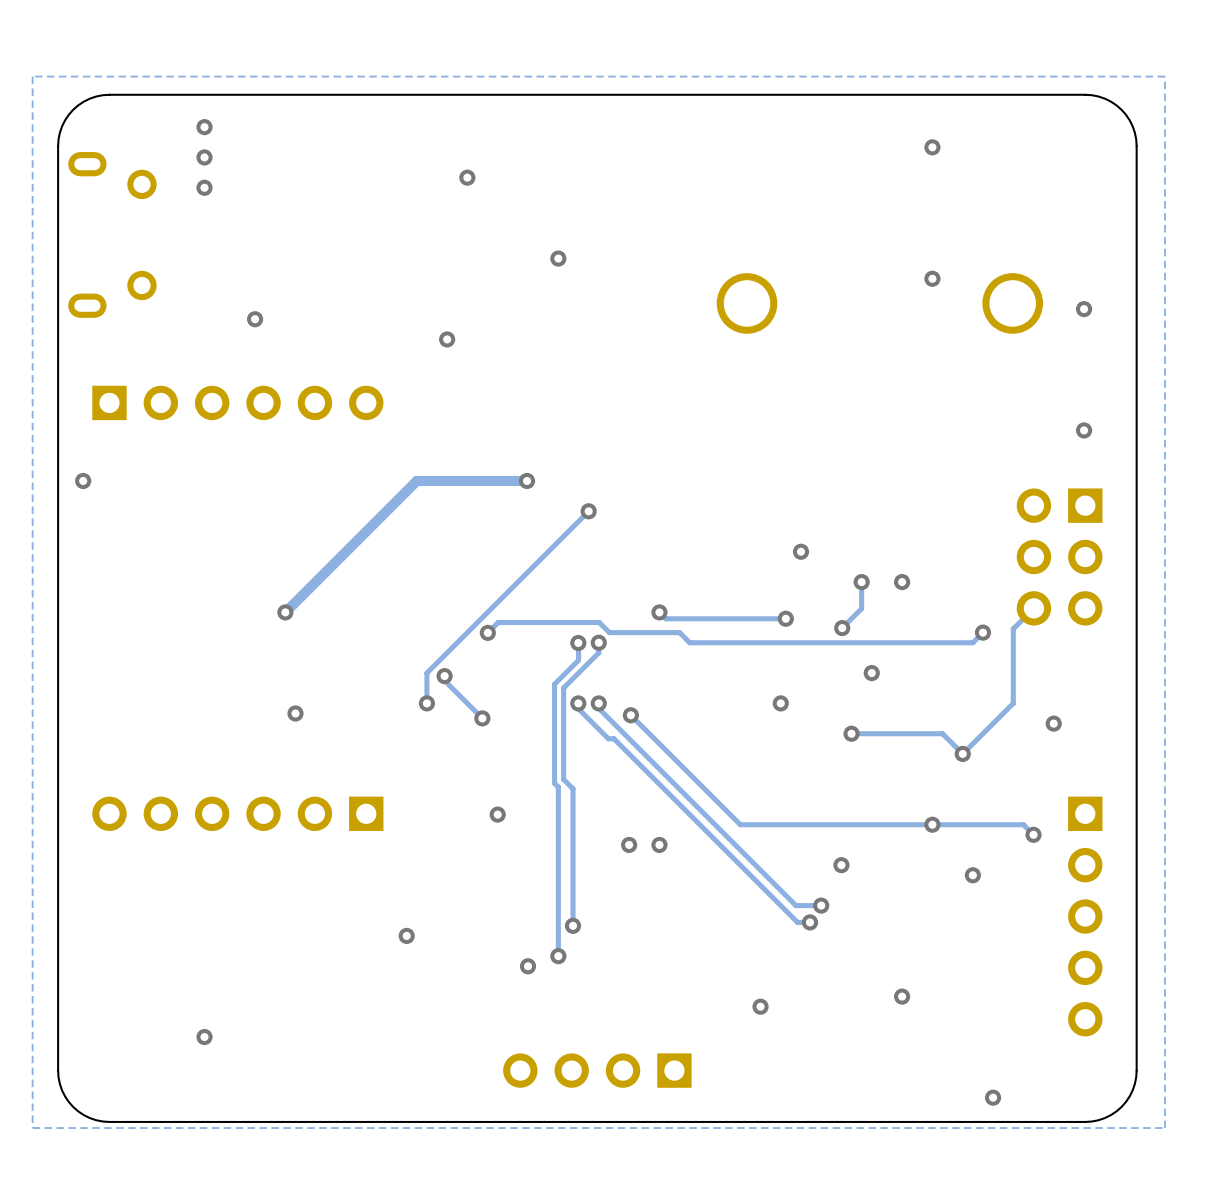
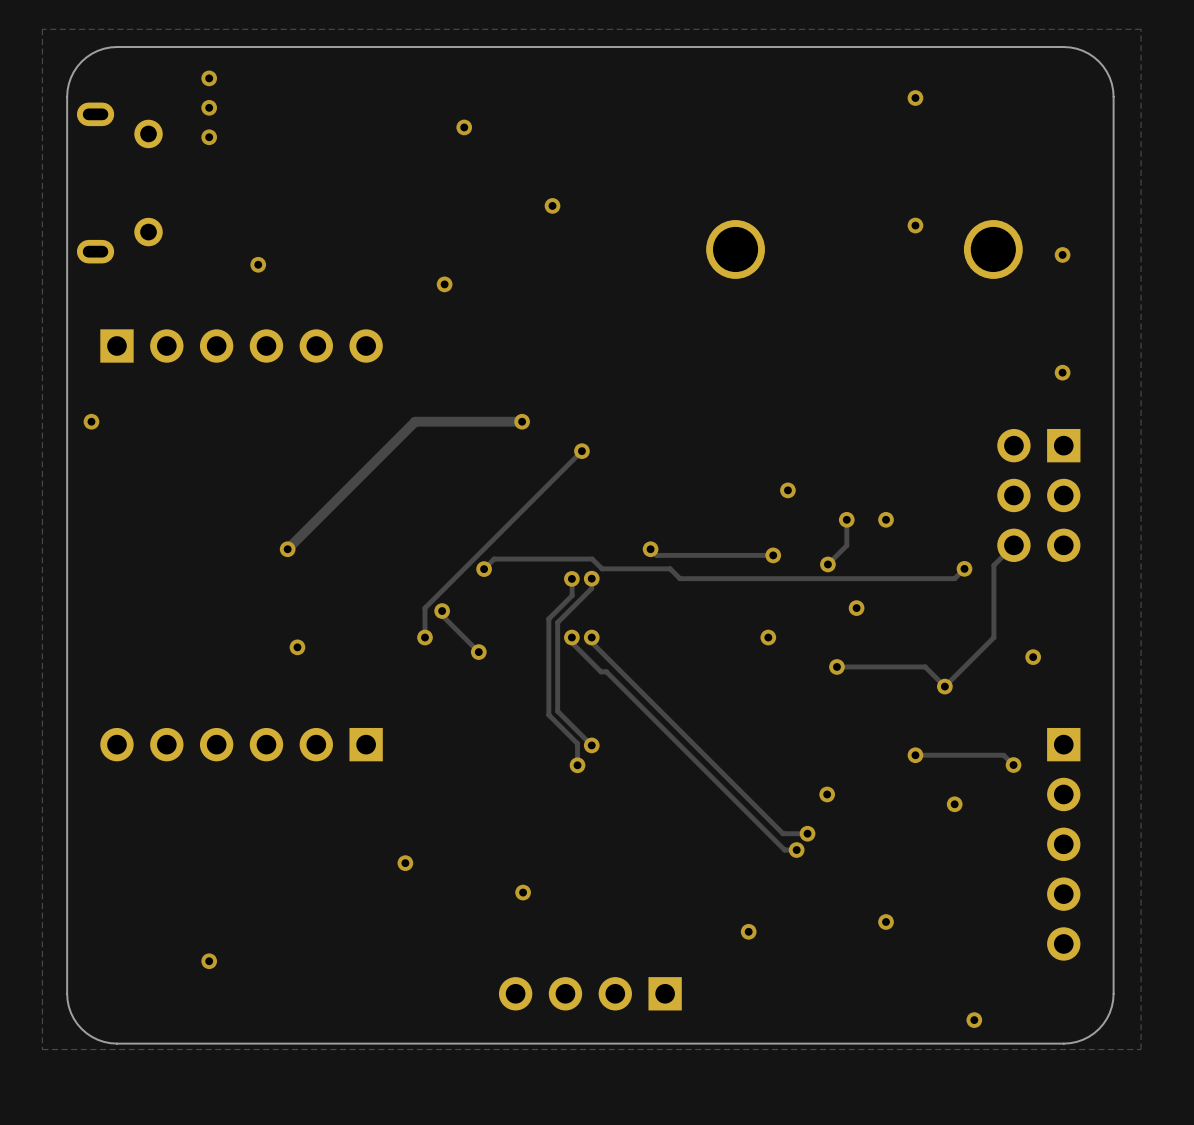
track: (630, 715) (740, 824) (932, 824) -> none
via: (630, 715) -> none
track: (558, 787) (558, 956) -> (552, 718) (577, 743) (577, 765)
track: (573, 788) (573, 925) -> (566, 720) (591, 745)
via: (497, 814) -> none
via: none -> (591, 745)
via: none -> (577, 765)
via: (629, 844) -> none
via: (659, 844) -> none
via: (573, 925) -> none
via: (558, 956) -> none

